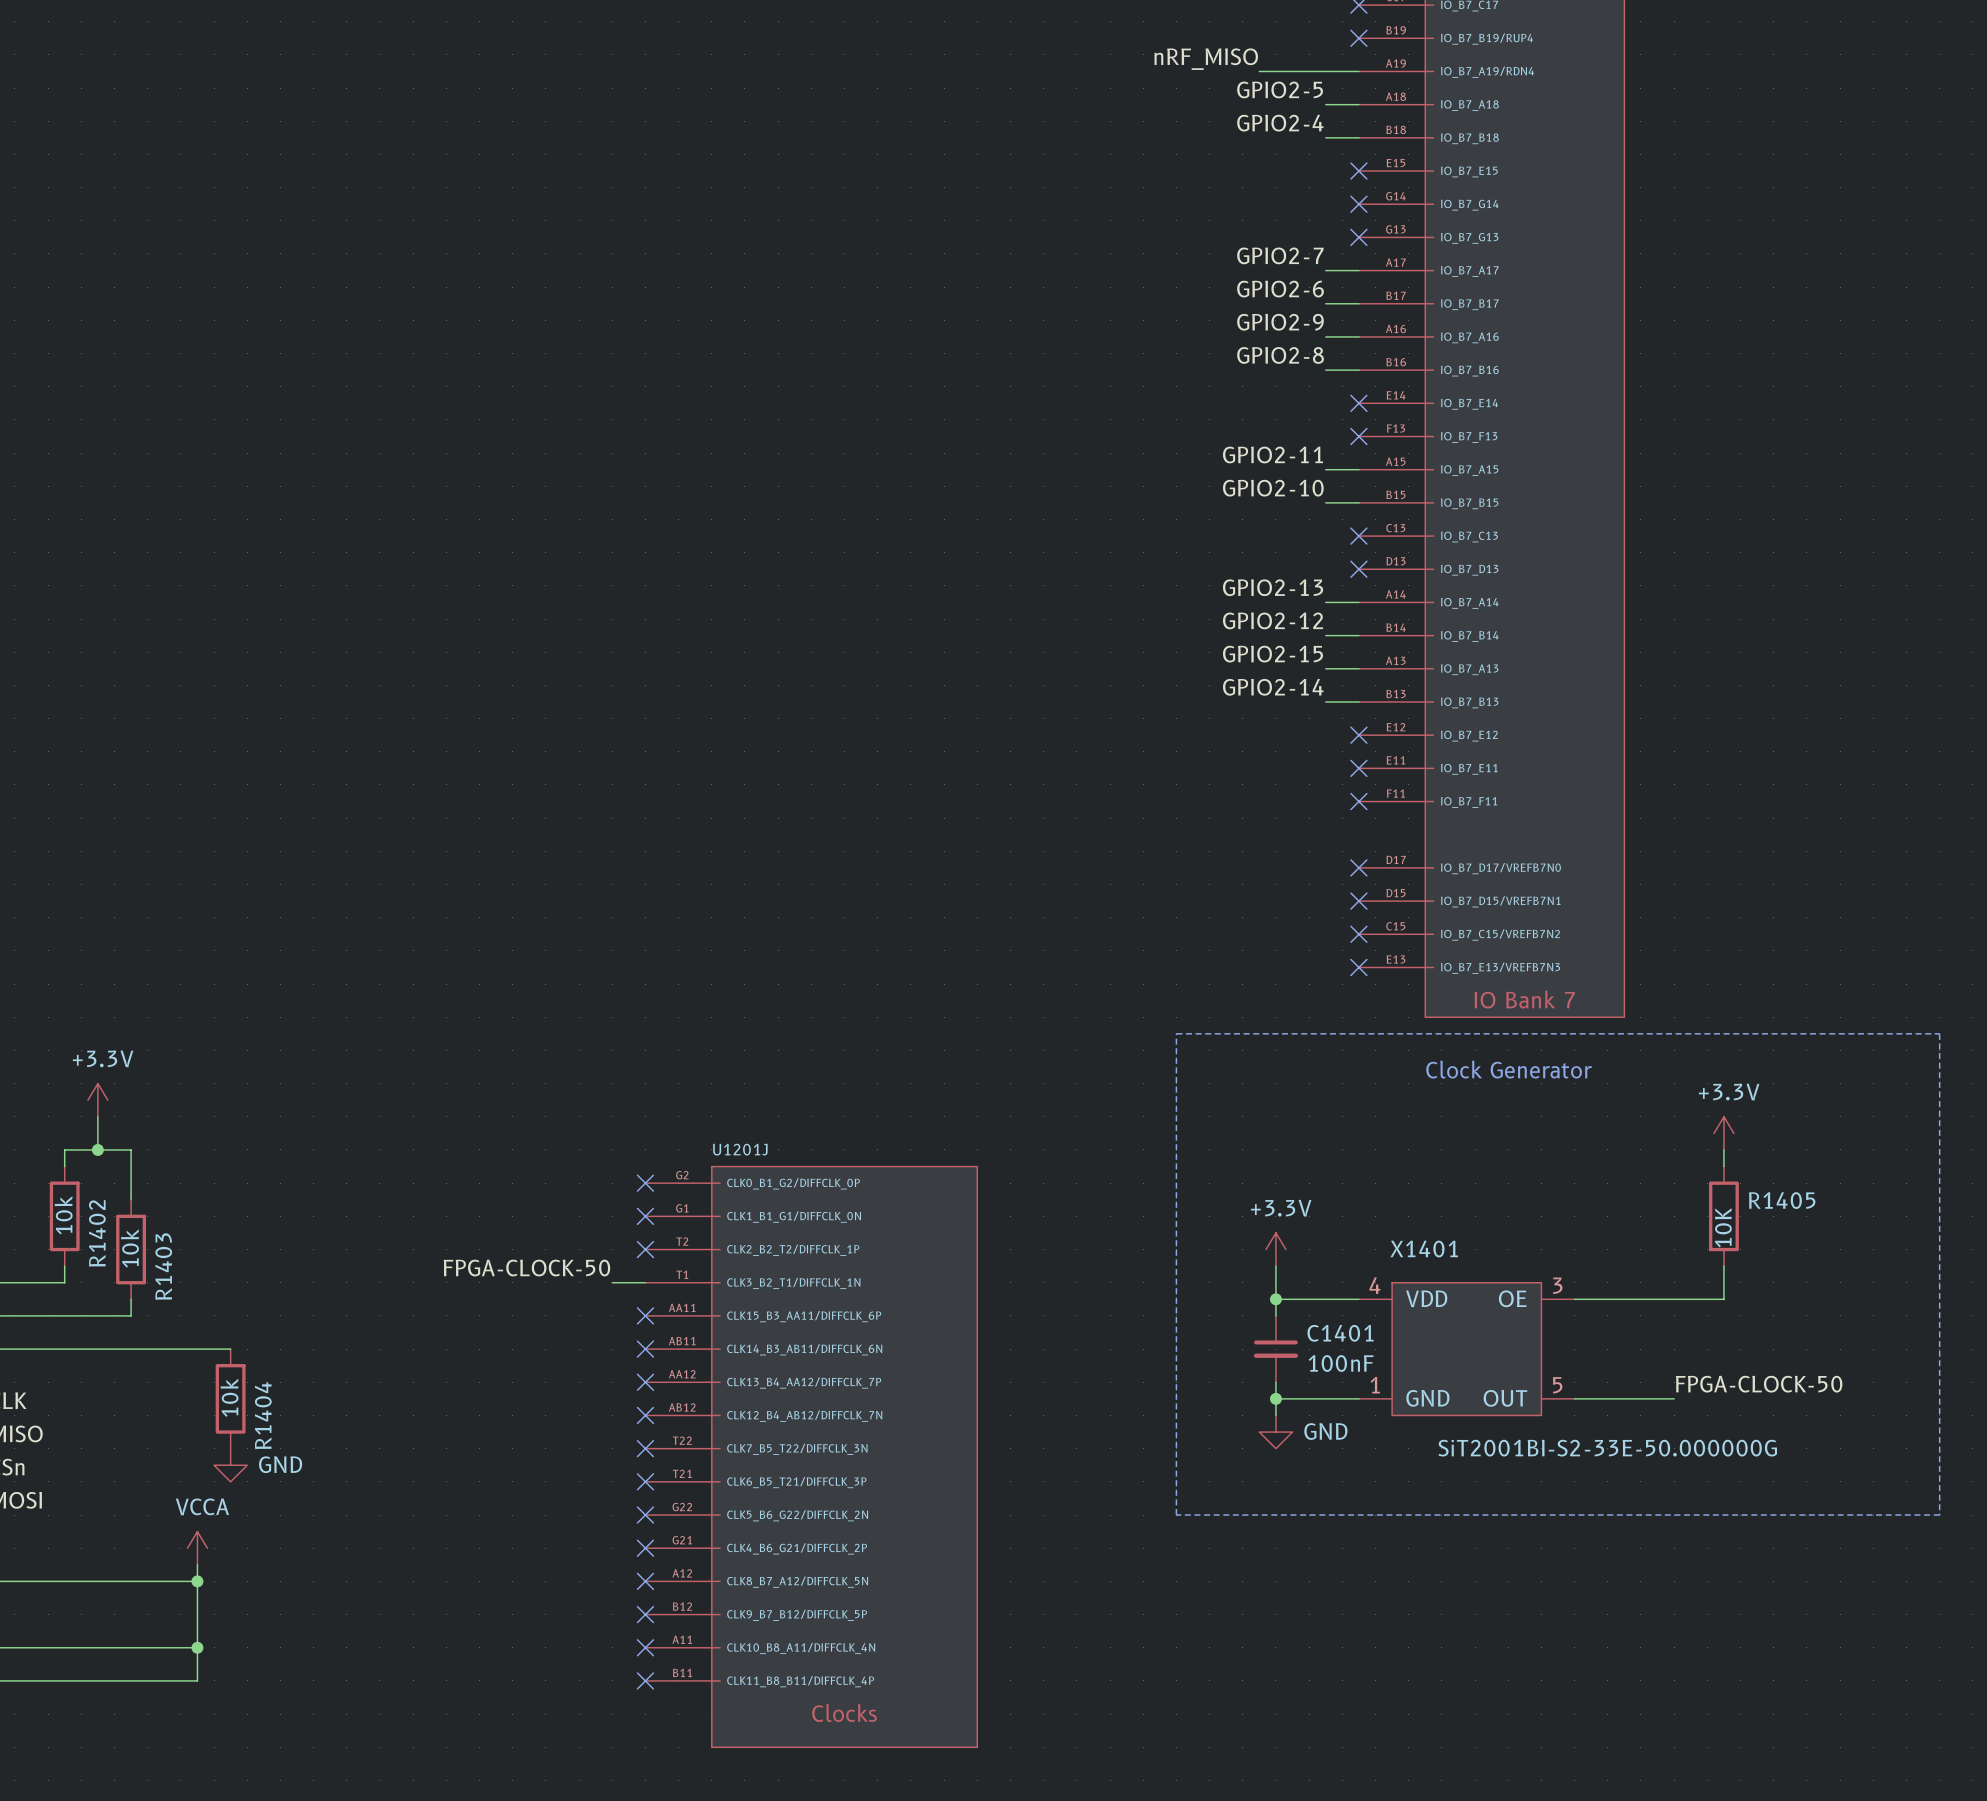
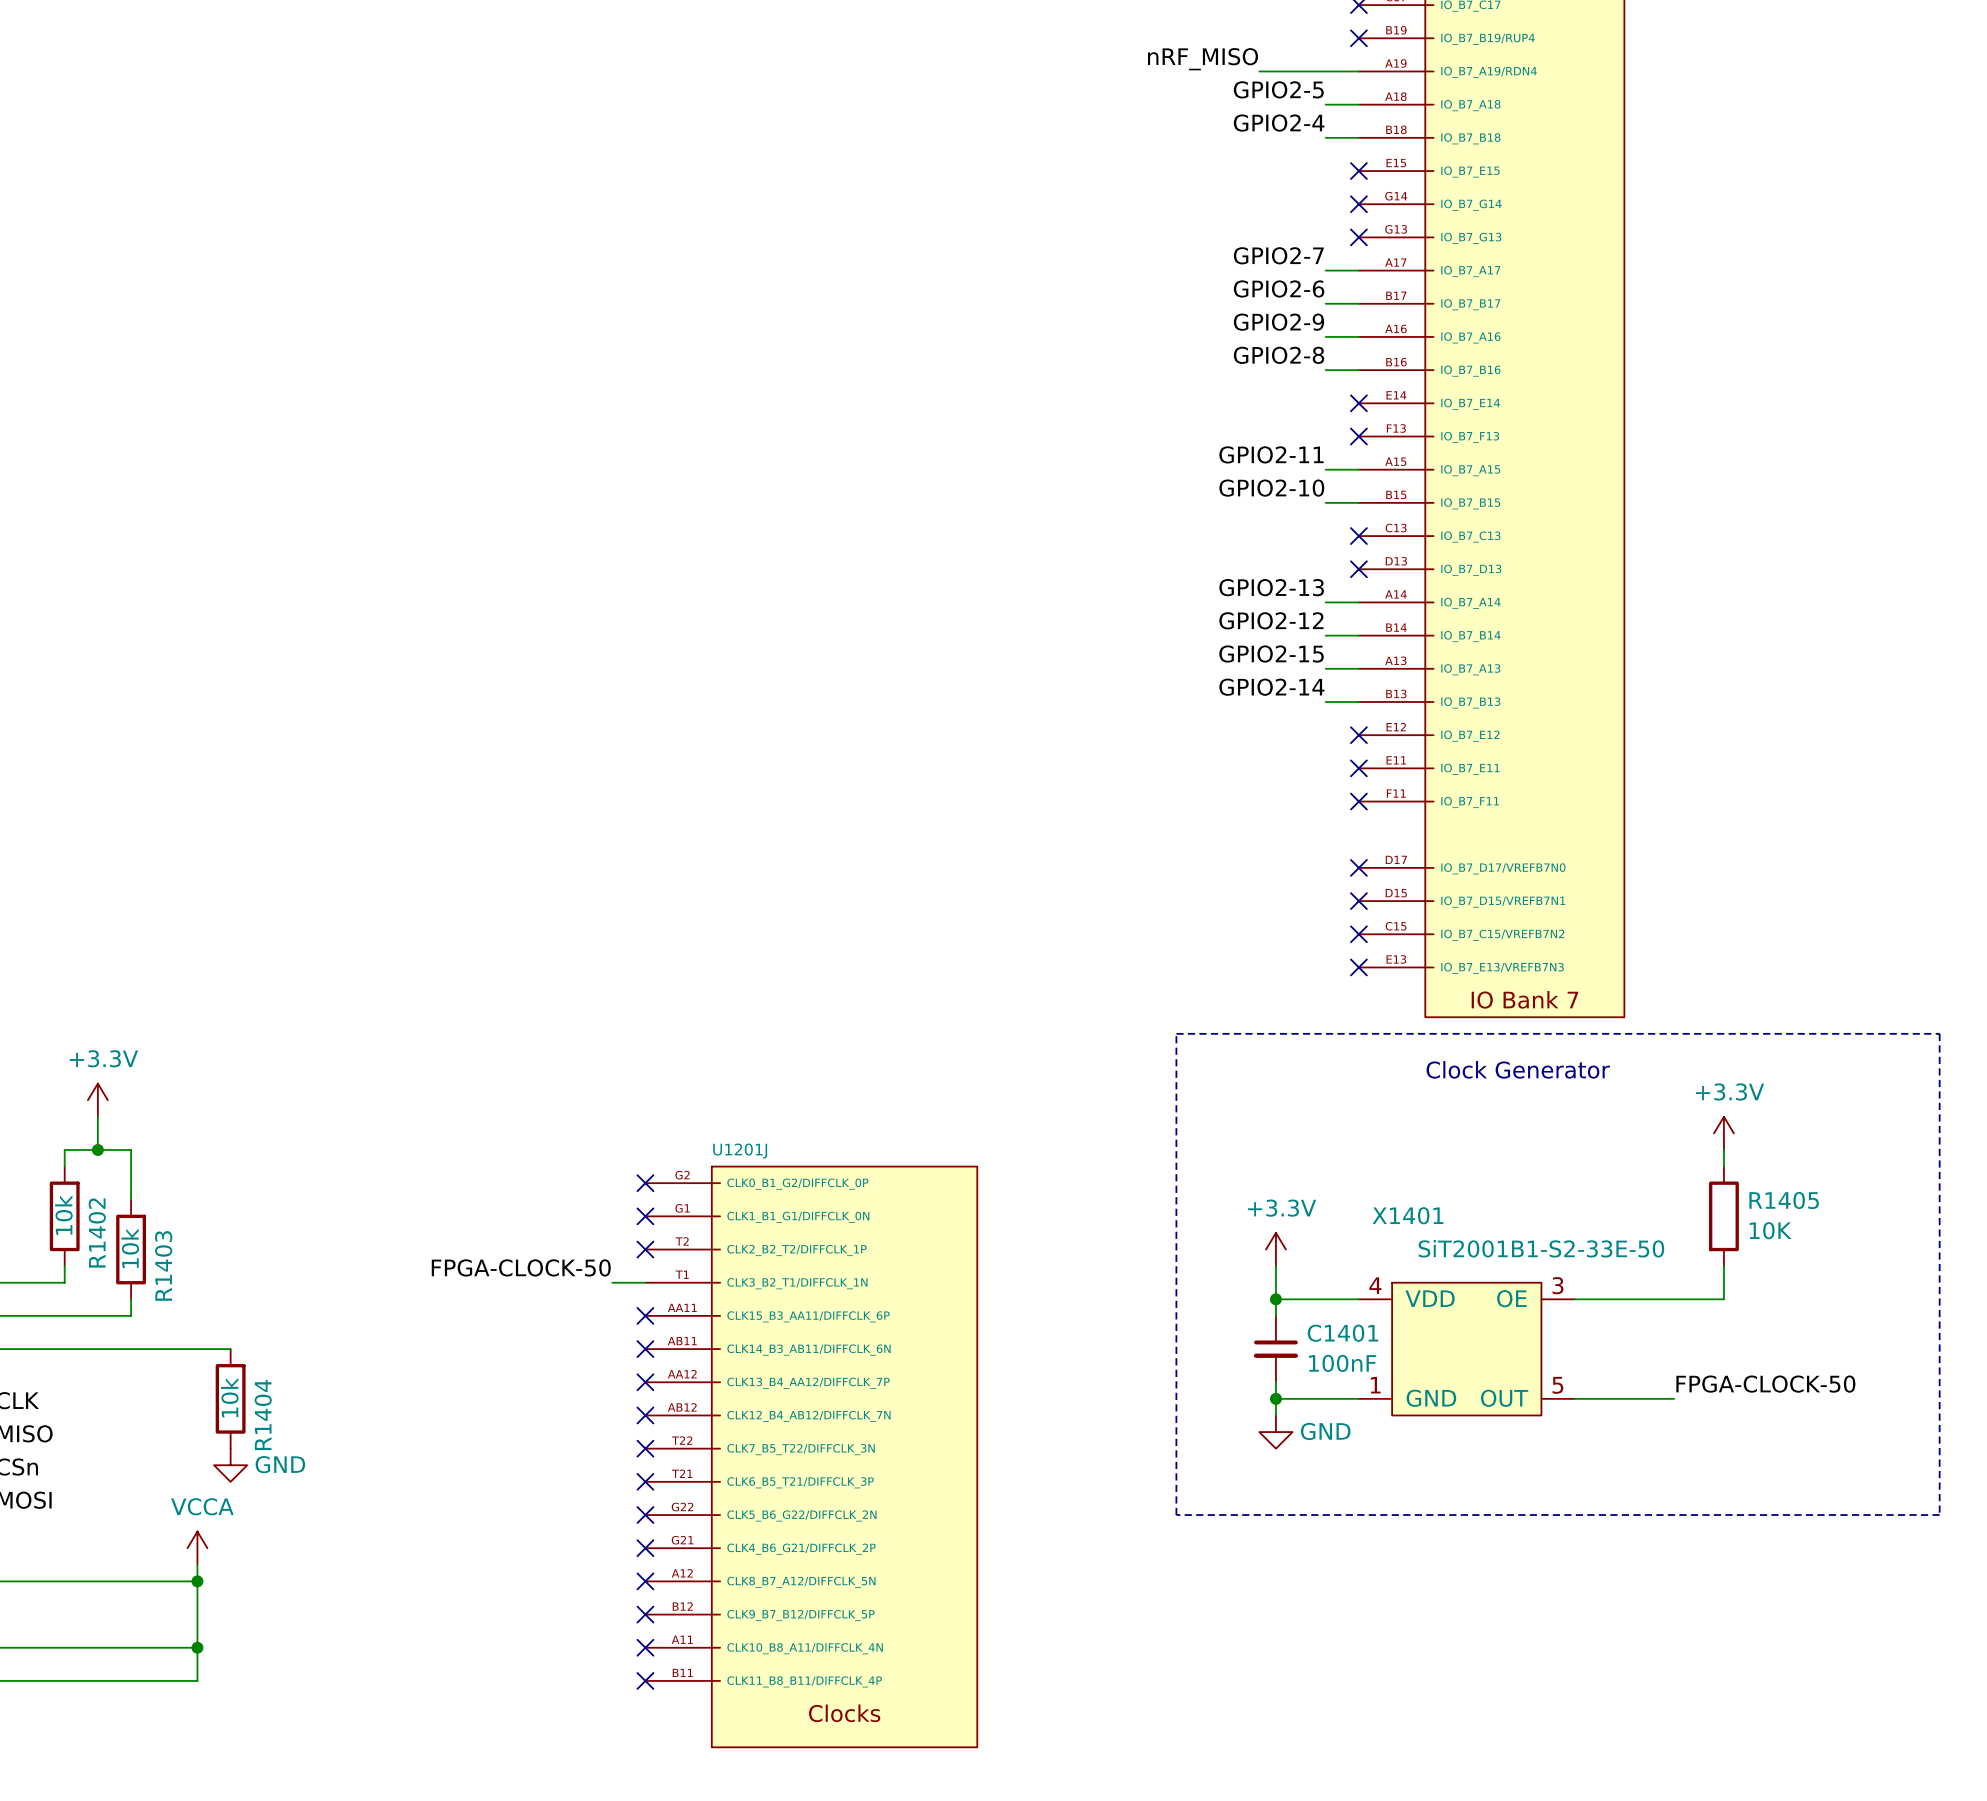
R1405 value rotation: 0° (1723, 1227) -> 90° clockwise (1770, 1230)
X1401 name position: X1401 (1424, 1249) -> X1401 (1407, 1215)
X1401 value: SiT2001BI-S2-33E-50.000000G (1607, 1448) -> SiT2001B1-S2-33E-50 (1541, 1248)

